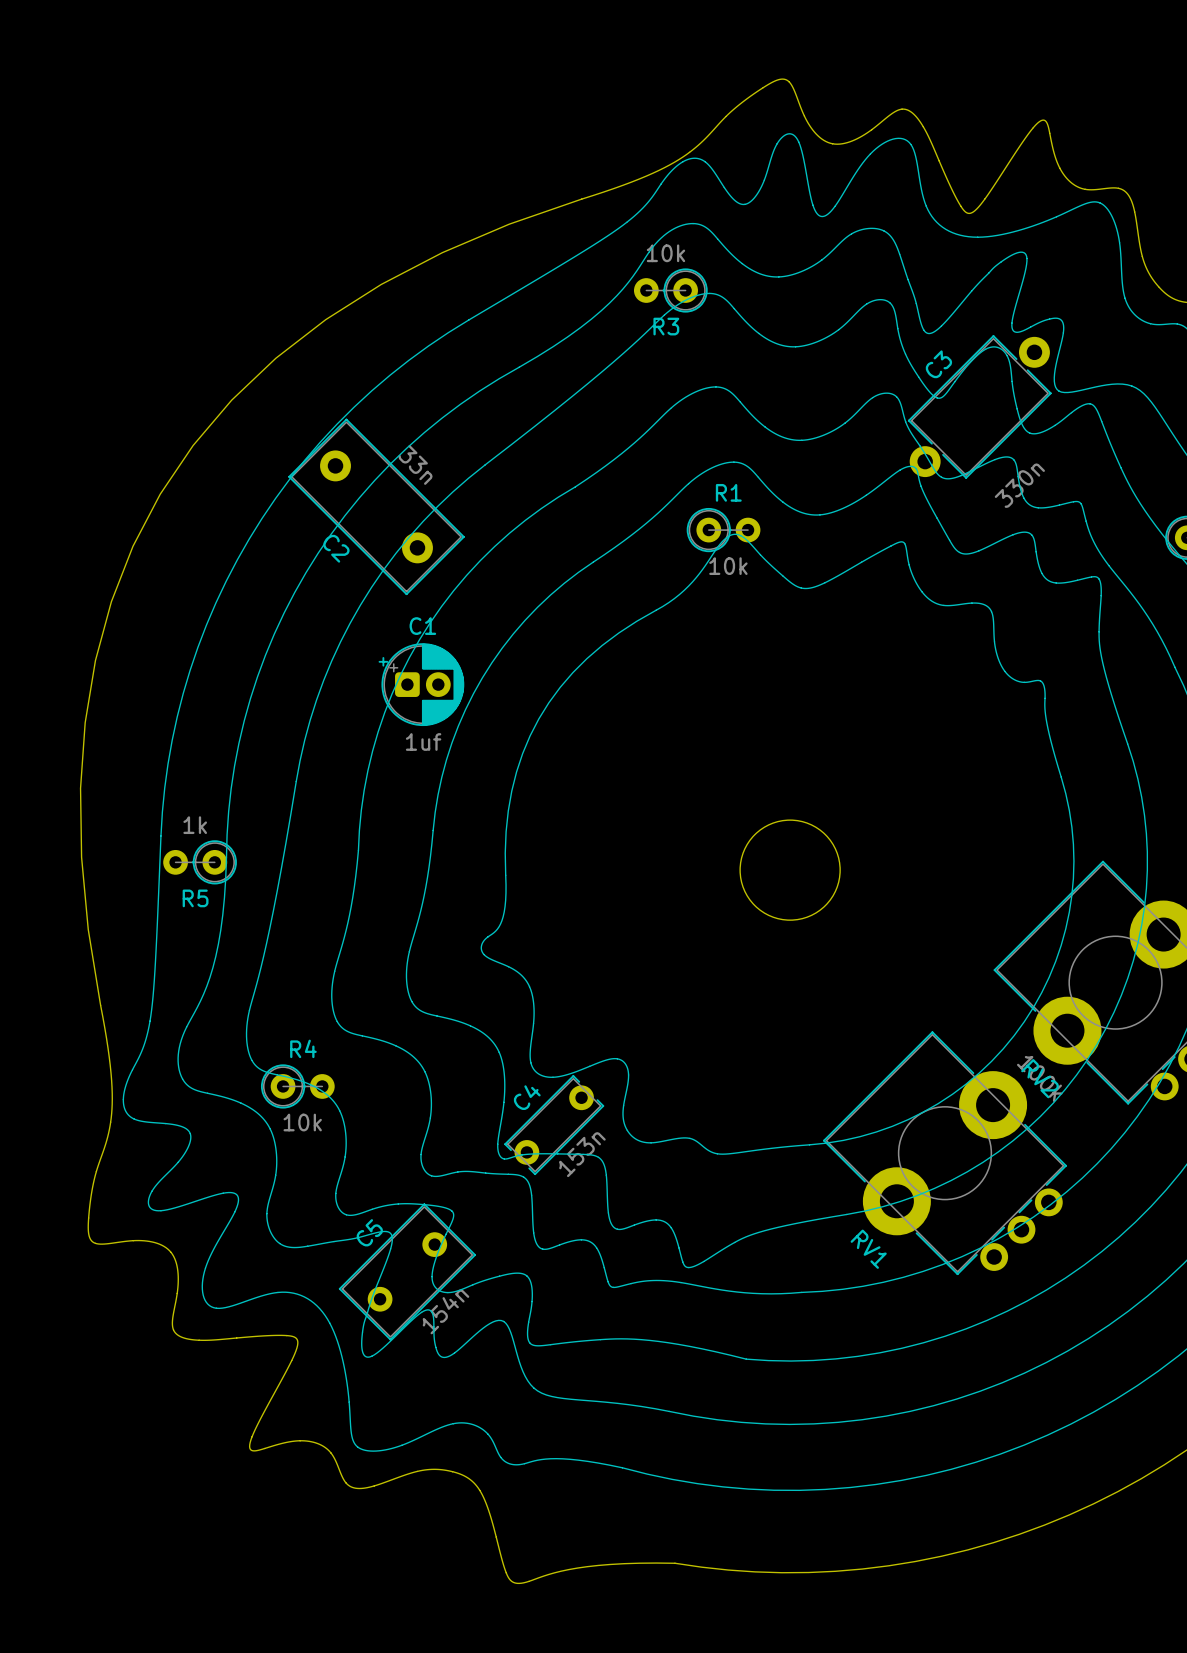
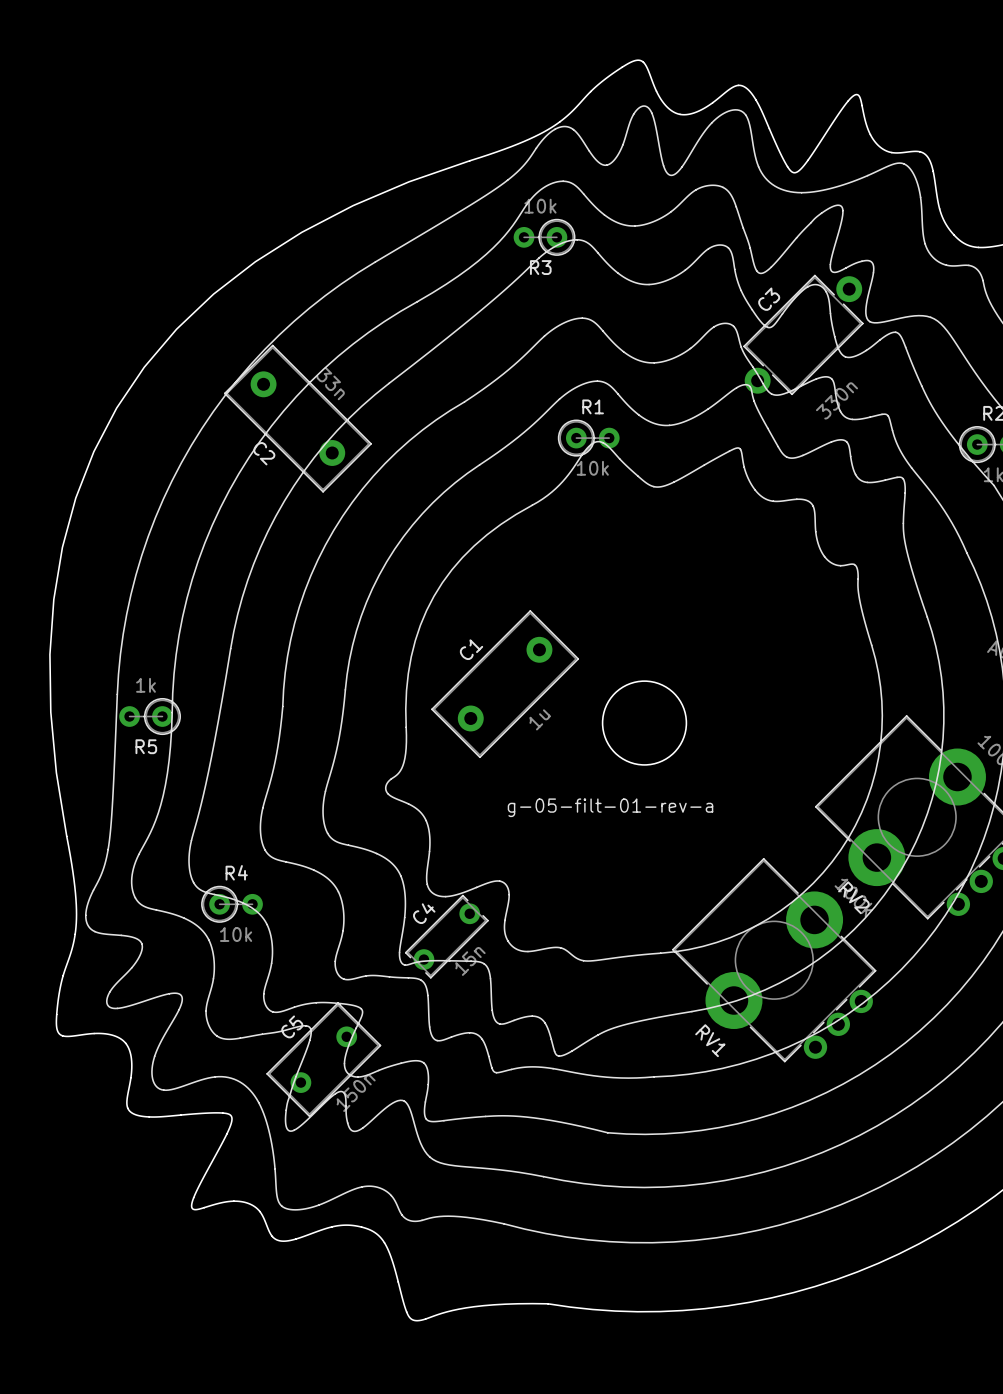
C1 name position: C1 (422, 626) -> C1 (471, 649)
C1 footprint: [378, 643, 465, 727] -> [431, 610, 580, 759]
C1 value: 1uf (423, 742) -> 1u (540, 719)
text: none -> g-05-filt-01-rev-a (610, 807)
C4 value: 153n (582, 1154) -> 15n (470, 961)
C5 value: 154n (446, 1311) -> 150n (356, 1093)

